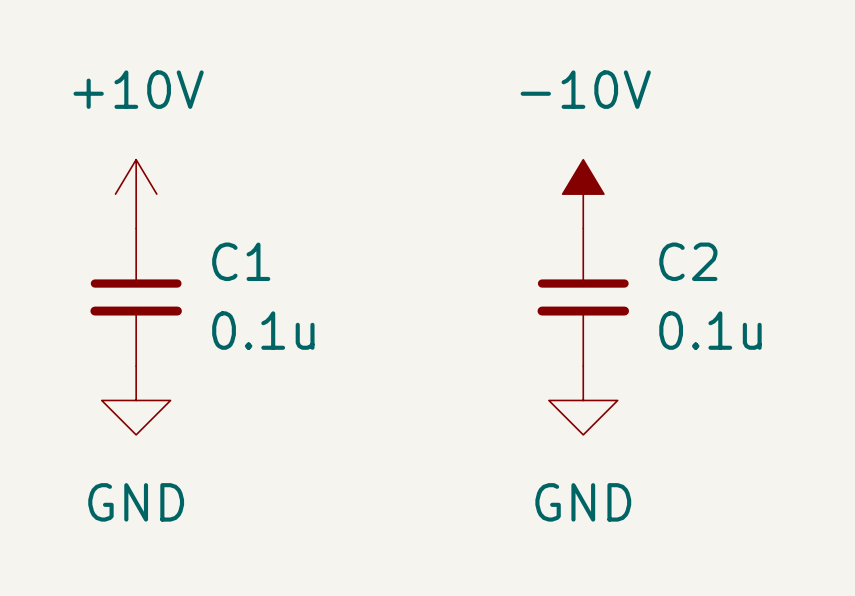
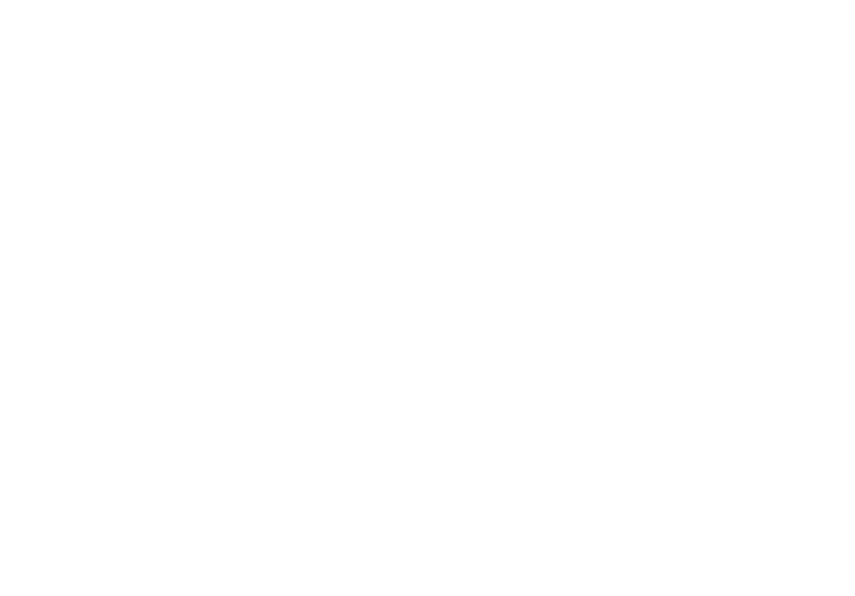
power symbol: +10V (136, 194) -> none
power symbol: -10V (583, 194) -> none
C1: 0.1u (136, 297) -> none
C2: 0.1u (583, 297) -> none
power symbol: GND (136, 400) -> none
power symbol: GND (583, 400) -> none

